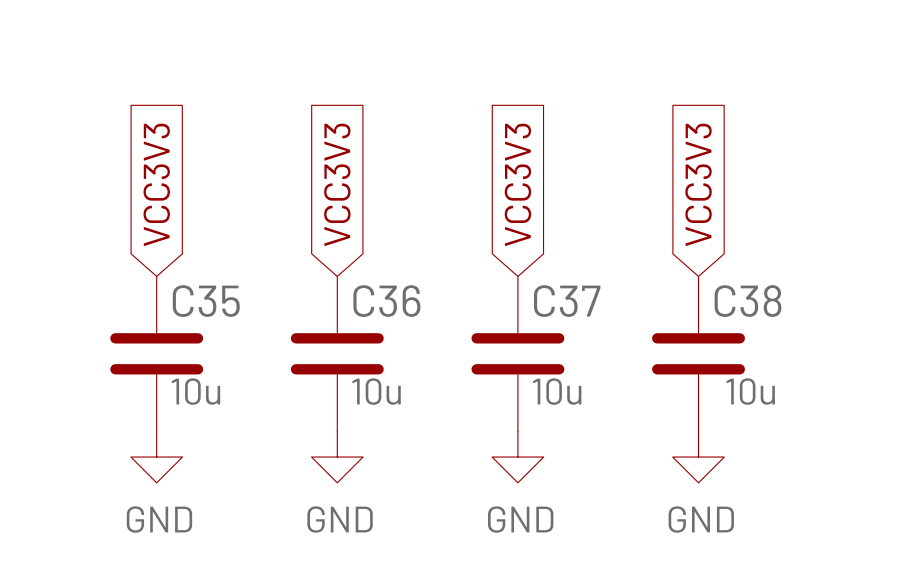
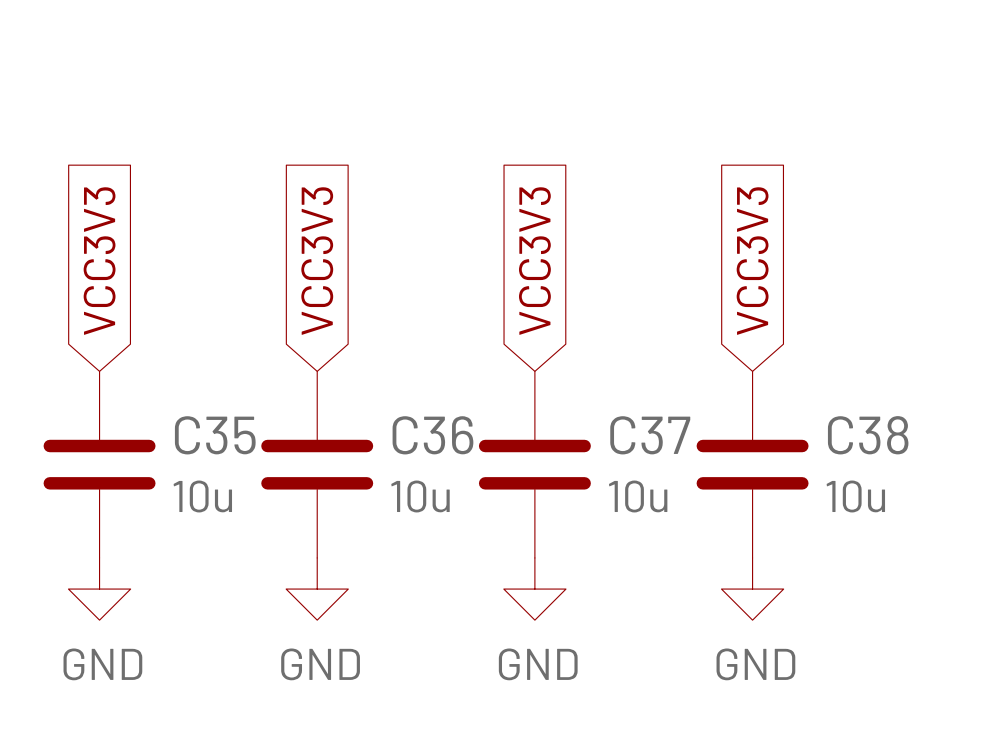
C35 name position: C35 (206, 301) -> C35 (215, 435)
C36 name position: C36 (386, 301) -> C36 (432, 435)
C37 name position: C37 (567, 301) -> C37 (650, 435)
C38 name position: C38 (748, 301) -> C38 (868, 435)
C35 text position: 10u (195, 391) -> 10u (202, 496)
C36 text position: 10u (376, 391) -> 10u (420, 496)
C37 text position: 10u (557, 391) -> 10u (638, 496)
C38 text position: 10u (750, 391) -> 10u (855, 496)

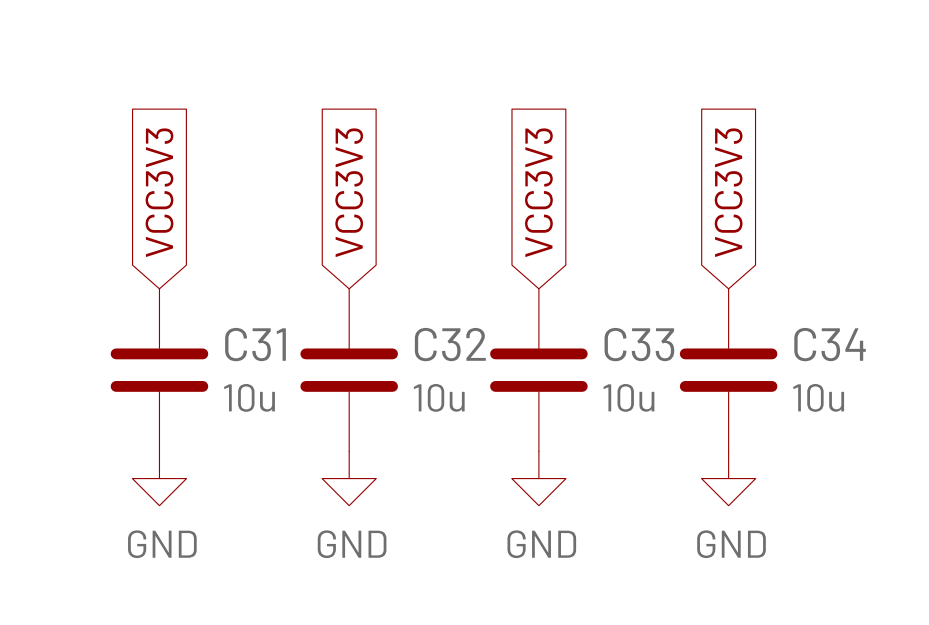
C35 name: C35 (215, 435) -> C31 (255, 344)
C36 name: C36 (432, 435) -> C32 (450, 344)
C37 name: C37 (650, 435) -> C33 (639, 344)
C38 name: C38 (868, 435) -> C34 (830, 344)

